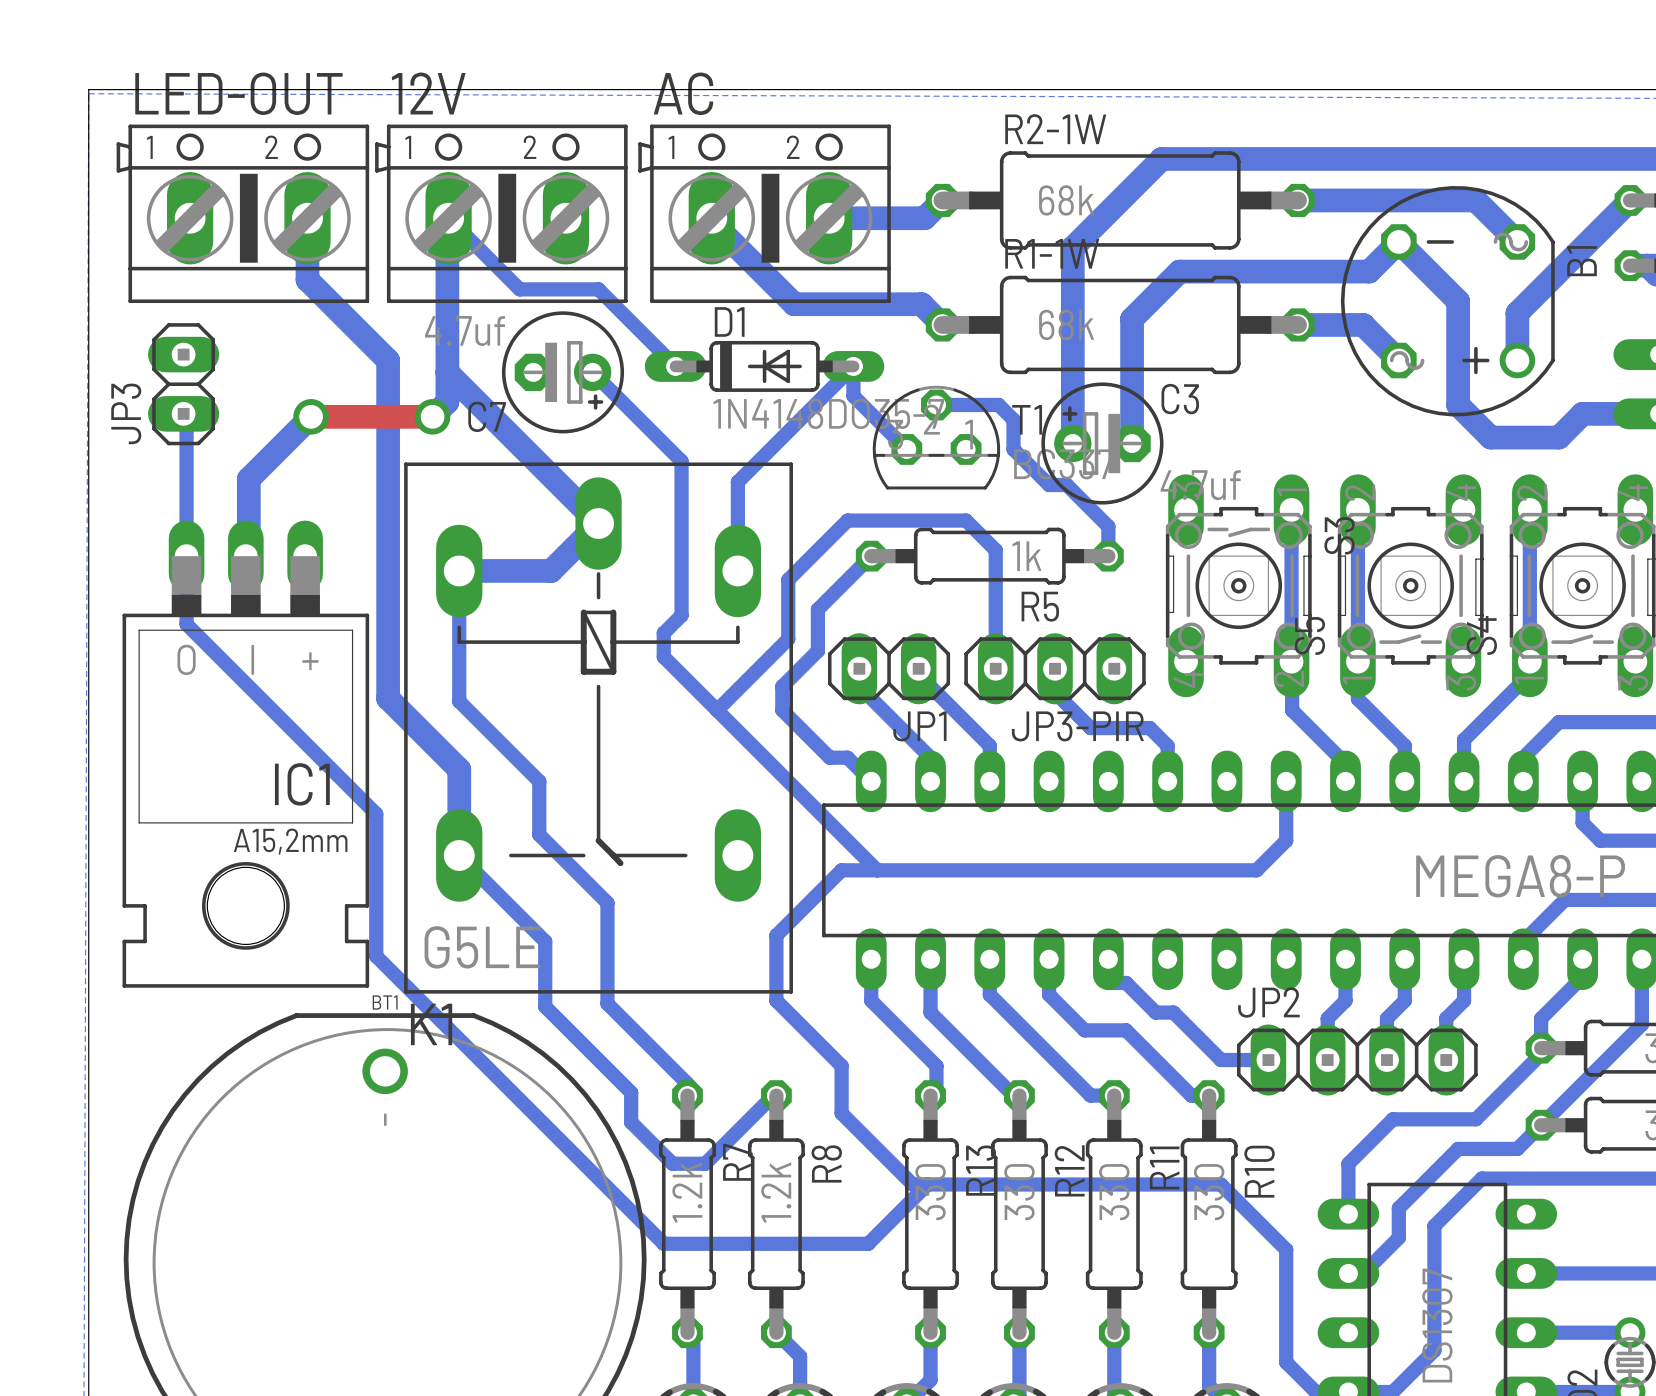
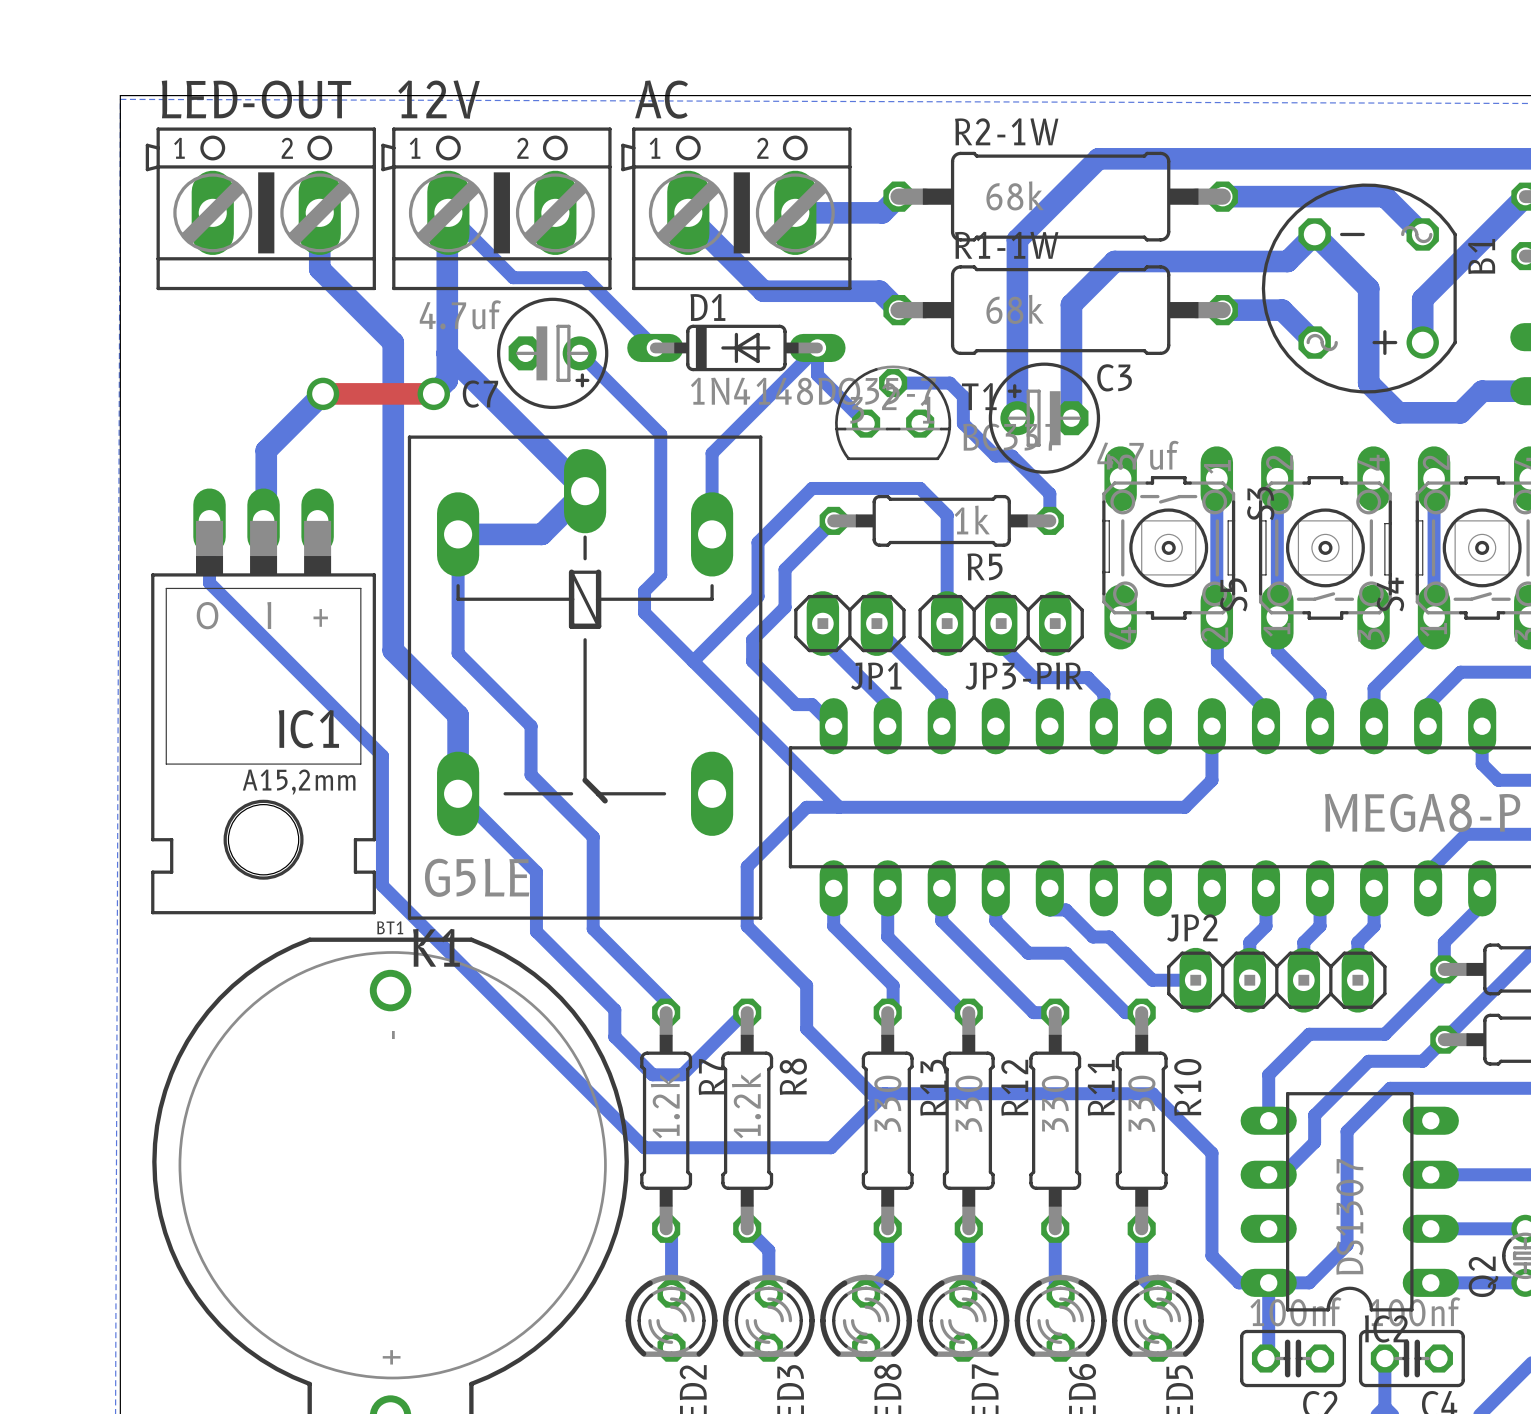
JP3: (183, 384) -> none
bottom track: (183, 413) (186, 413) (186, 556) -> none

